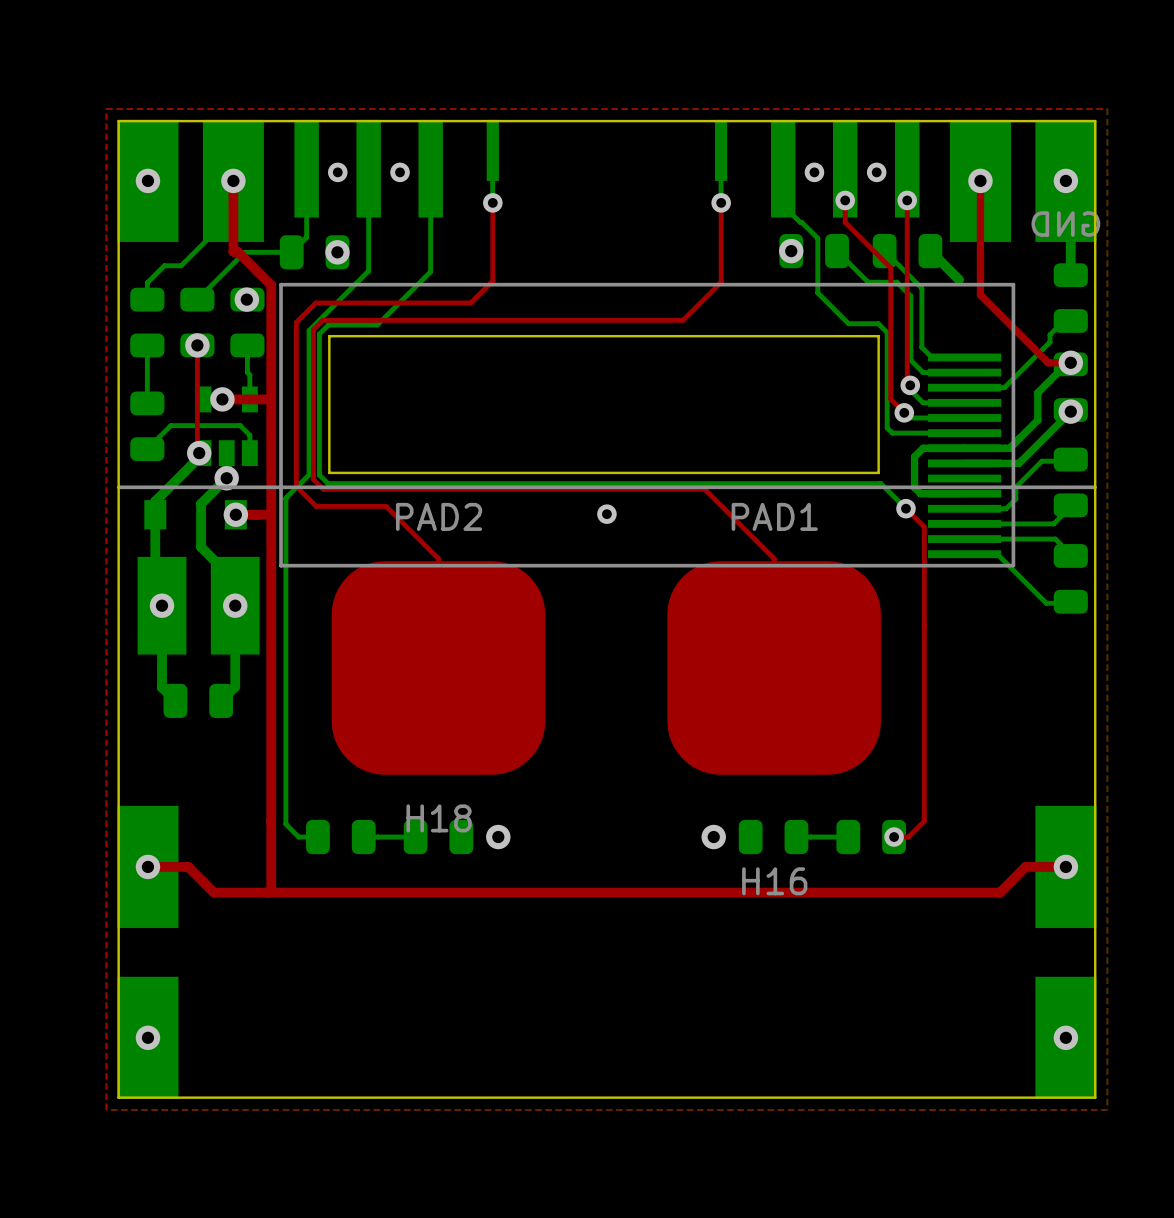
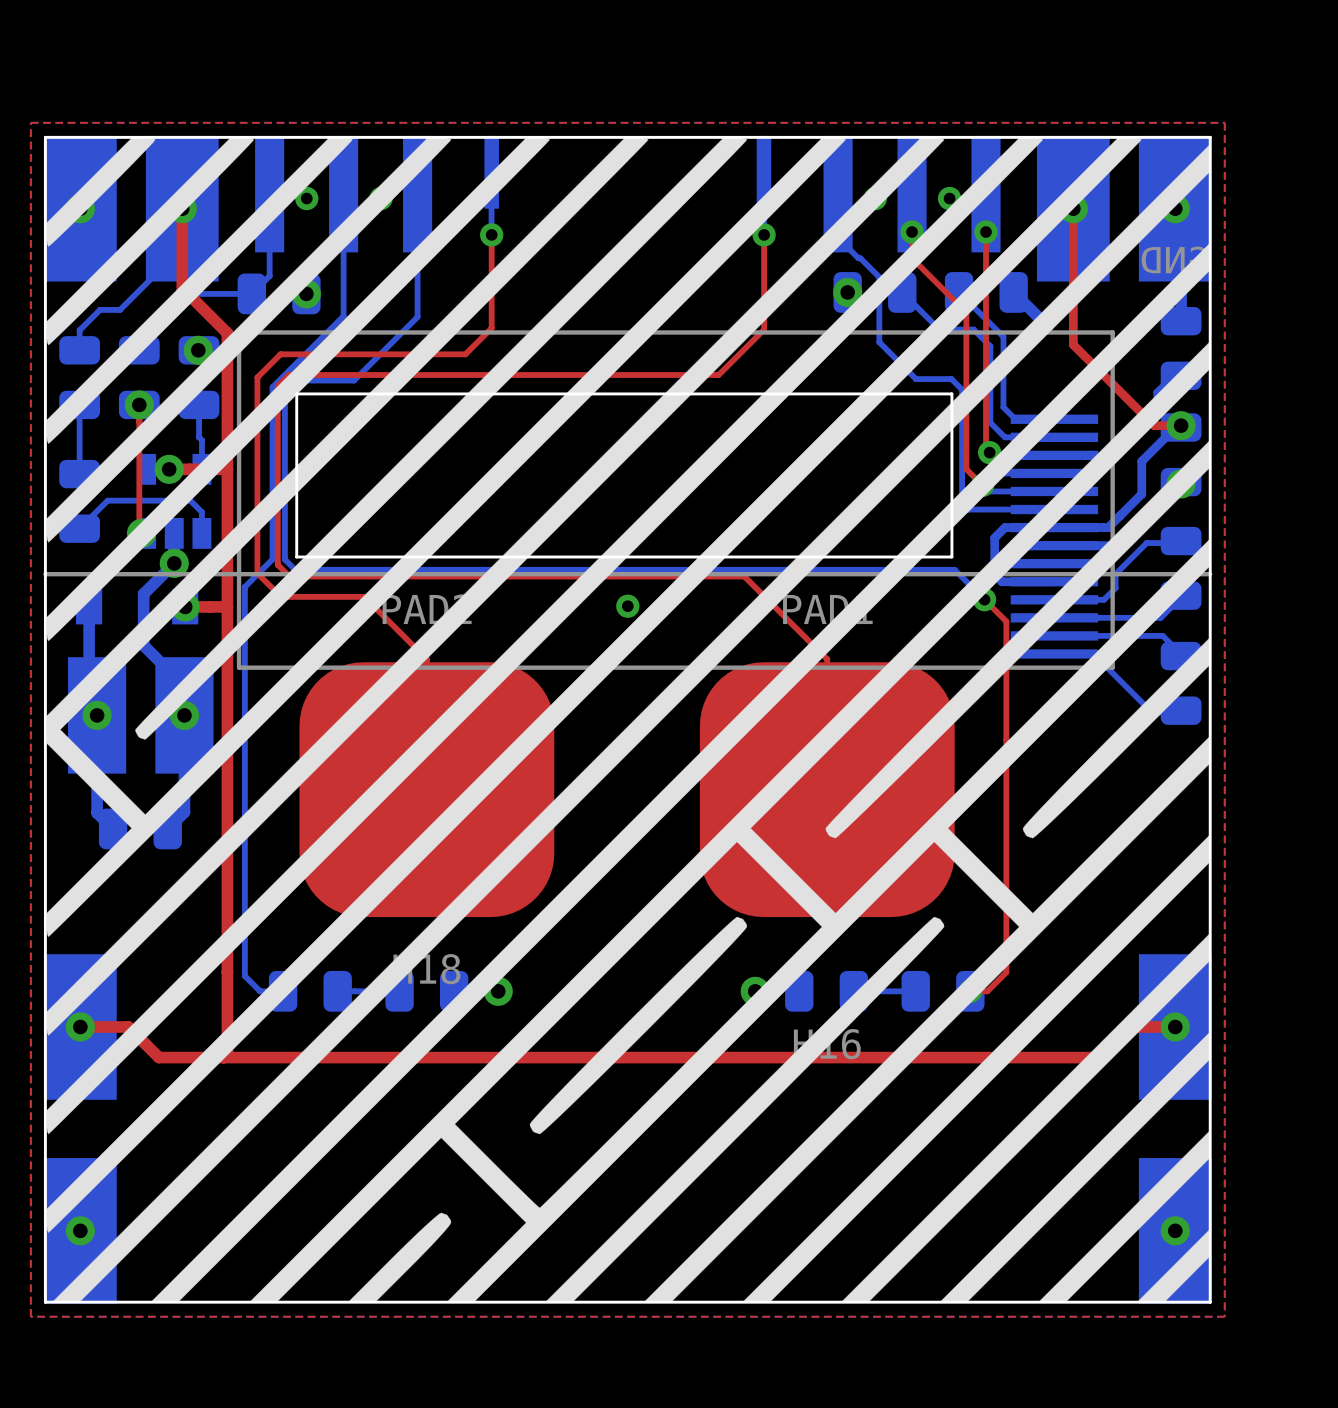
drawing: none -> [46, 137, 1211, 1302]

